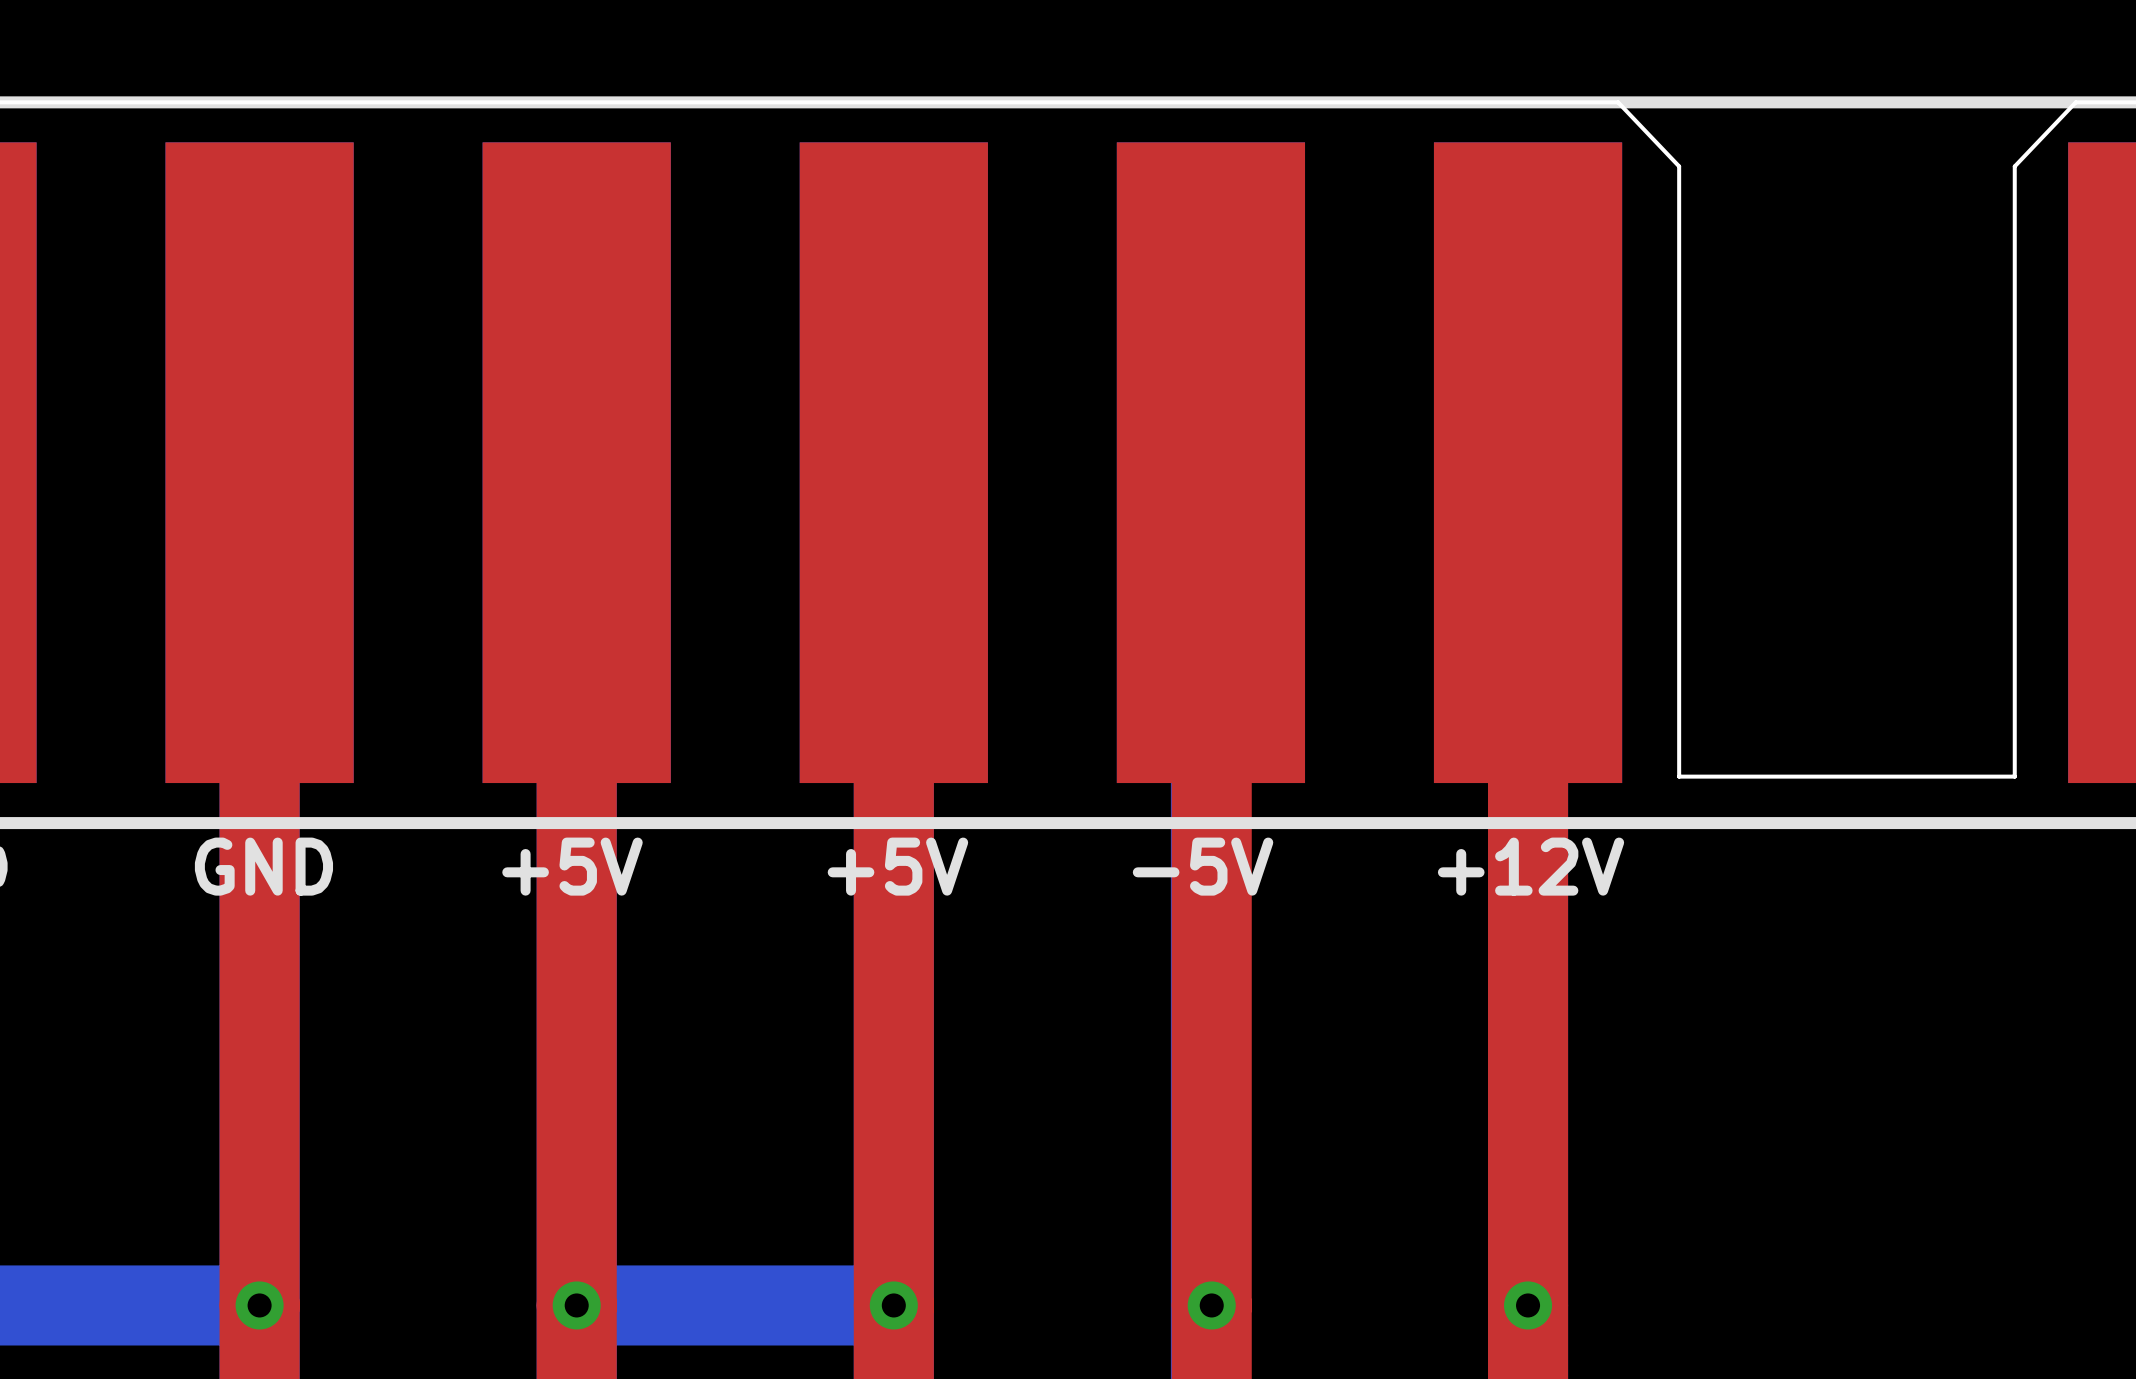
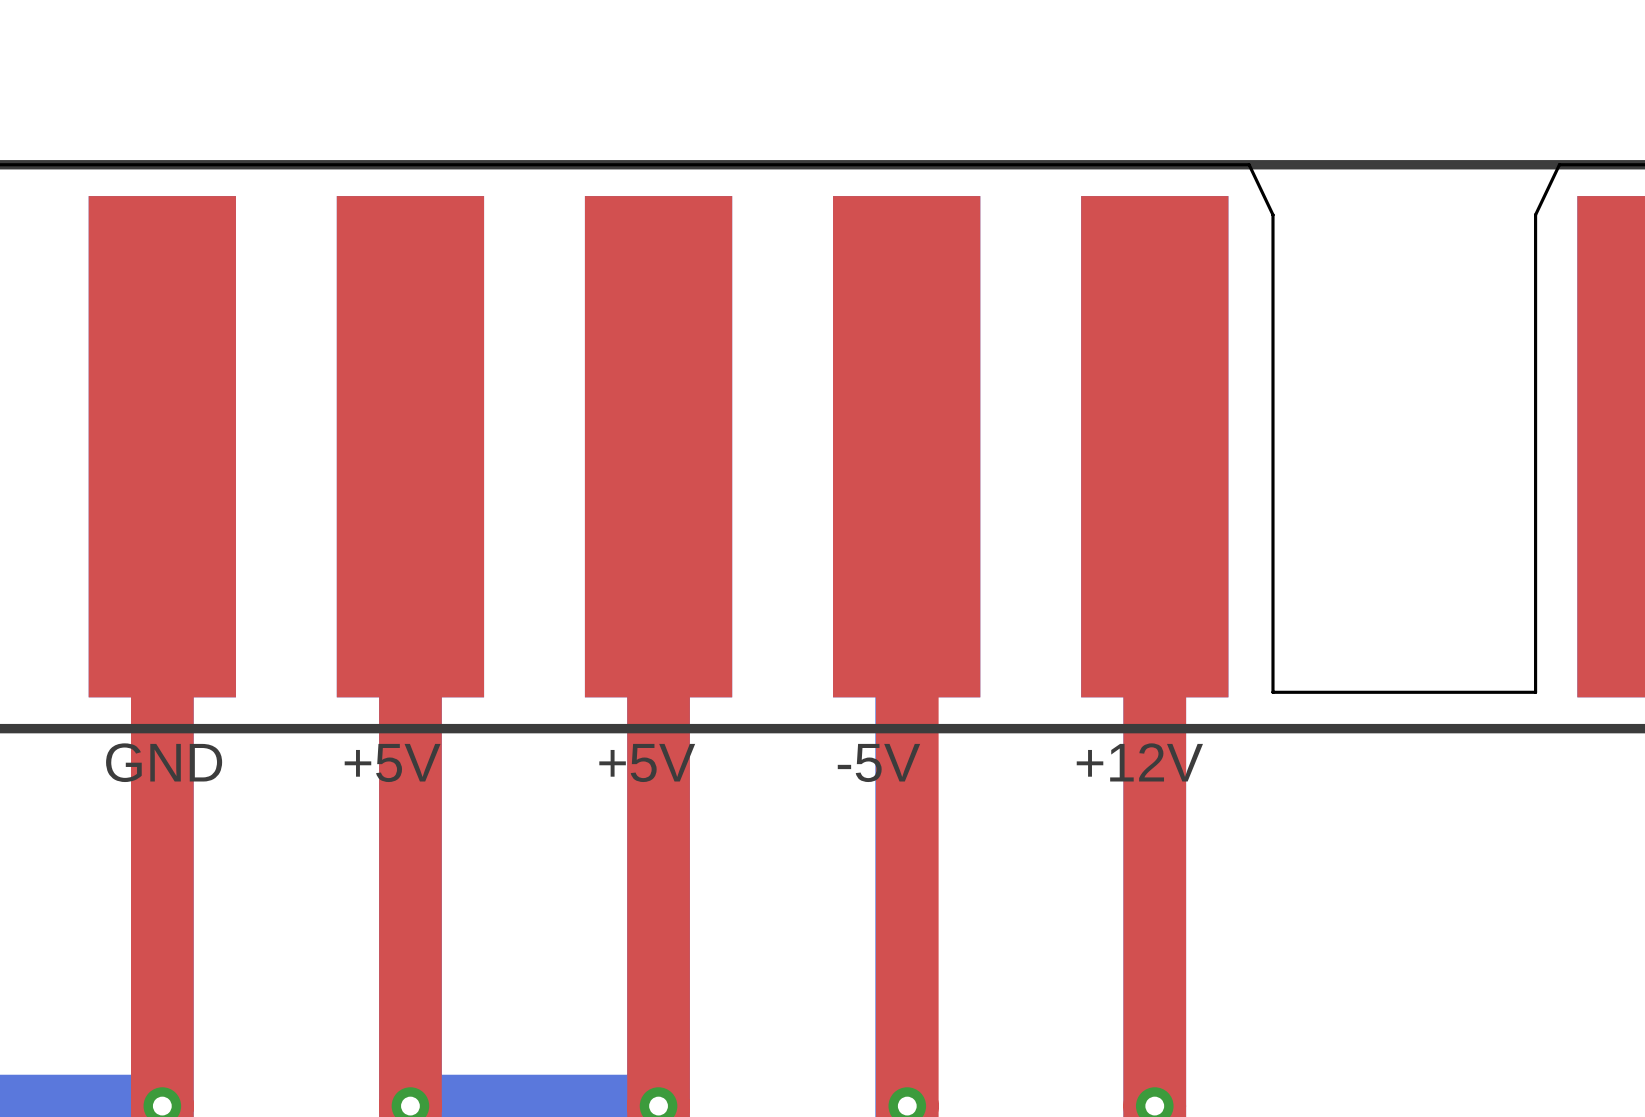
board edge: (1618, 102) (1679, 166) -> (1225, 164) (1249, 164) (1272, 214)
board edge: (2075, 102) (2014, 166) -> (1583, 164) (1559, 164) (1535, 214)

